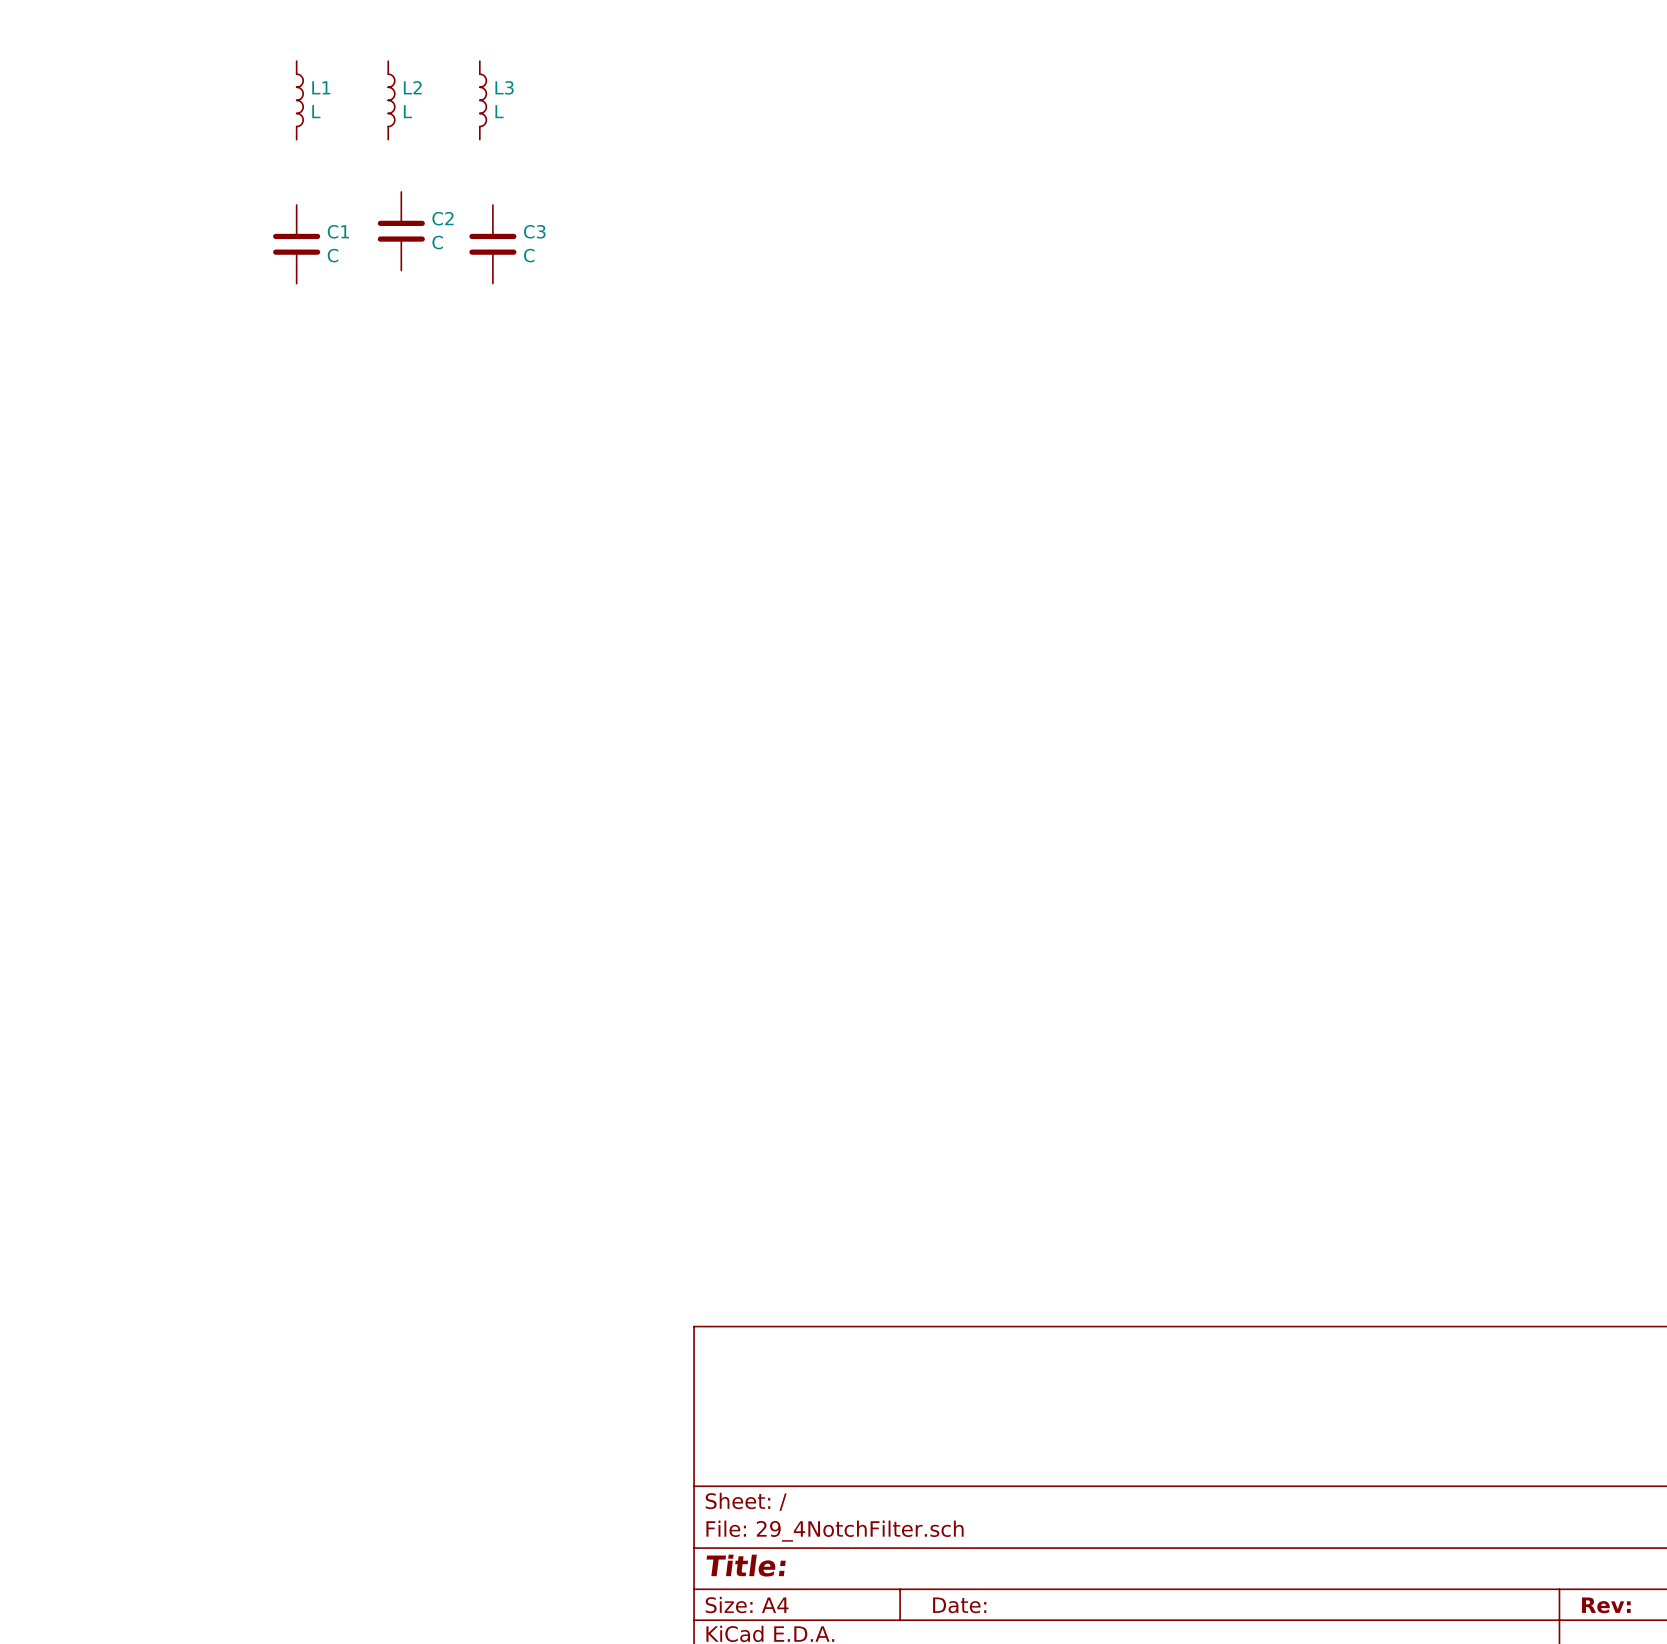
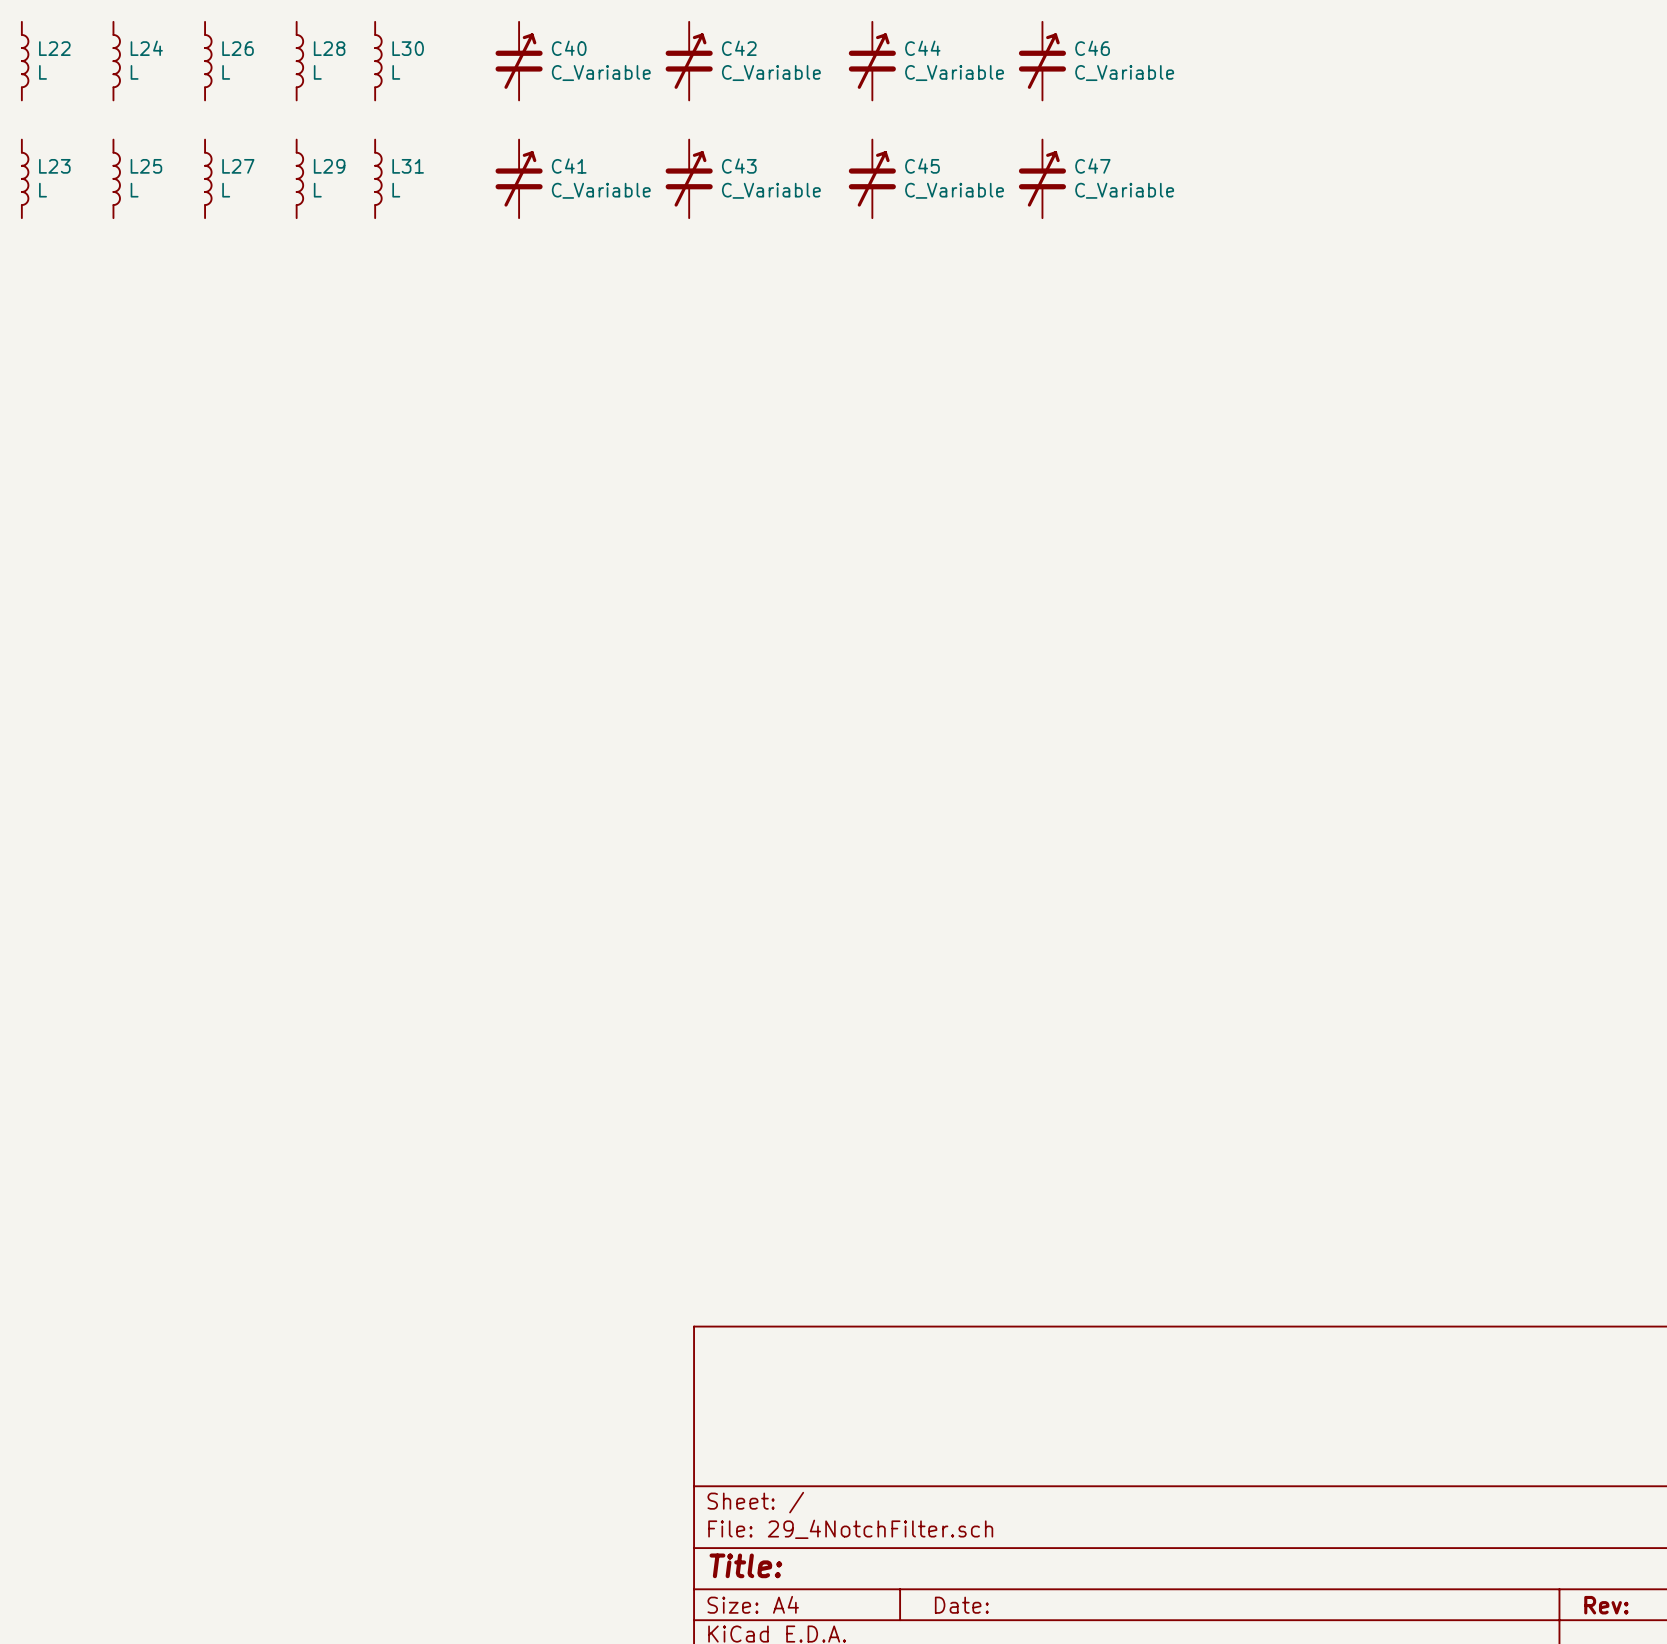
L22: none -> L (25, 61)
L24: none -> L (116, 61)
L26: none -> L (208, 61)
L28: none -> L (299, 61)
L30: none -> L (378, 61)
C40: none -> C_Variable (519, 61)
C42: none -> C_Variable (689, 61)
C44: none -> C_Variable (872, 61)
C46: none -> C_Variable (1042, 61)
L1: L (299, 100) -> none
L2: L (391, 100) -> none
L3: L (483, 100) -> none
L23: none -> L (25, 178)
L25: none -> L (116, 178)
L27: none -> L (208, 178)
L29: none -> L (299, 178)
L31: none -> L (378, 178)
C41: none -> C_Variable (519, 178)
C43: none -> C_Variable (689, 178)
C45: none -> C_Variable (872, 178)
C47: none -> C_Variable (1042, 178)
C2: C (401, 231) -> none
C1: C (296, 244) -> none
C3: C (492, 244) -> none

